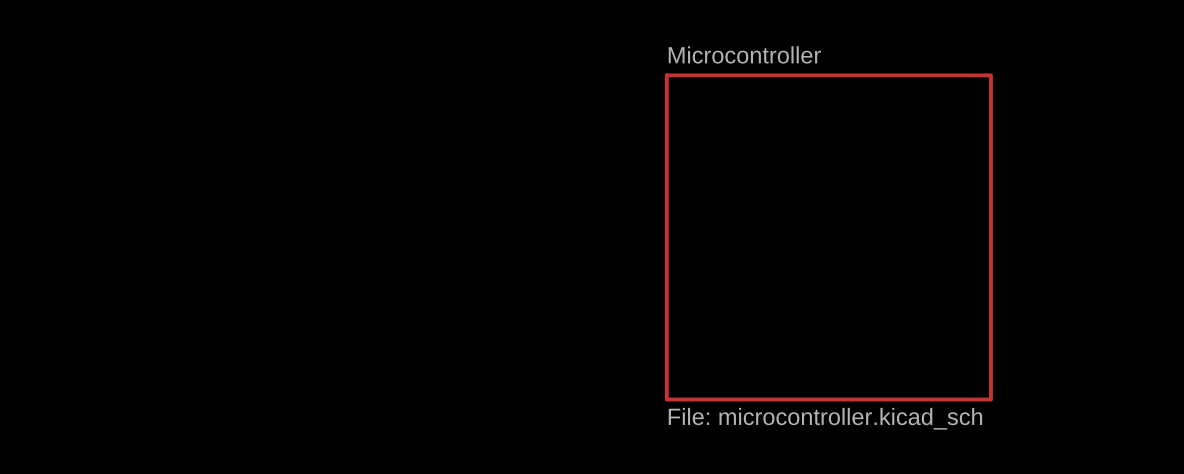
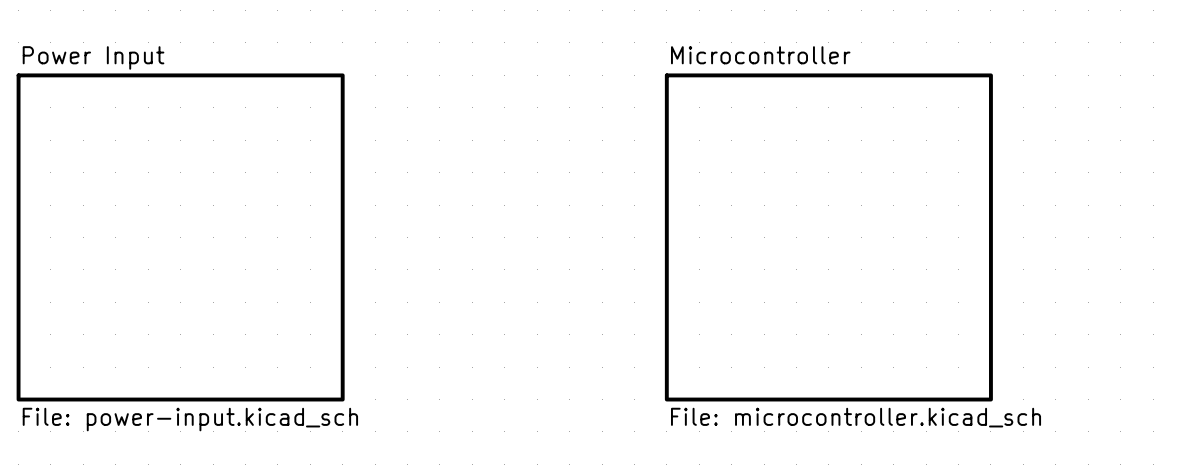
sheet Power Input: none -> File: power-input.kicad_sch (180, 237)

